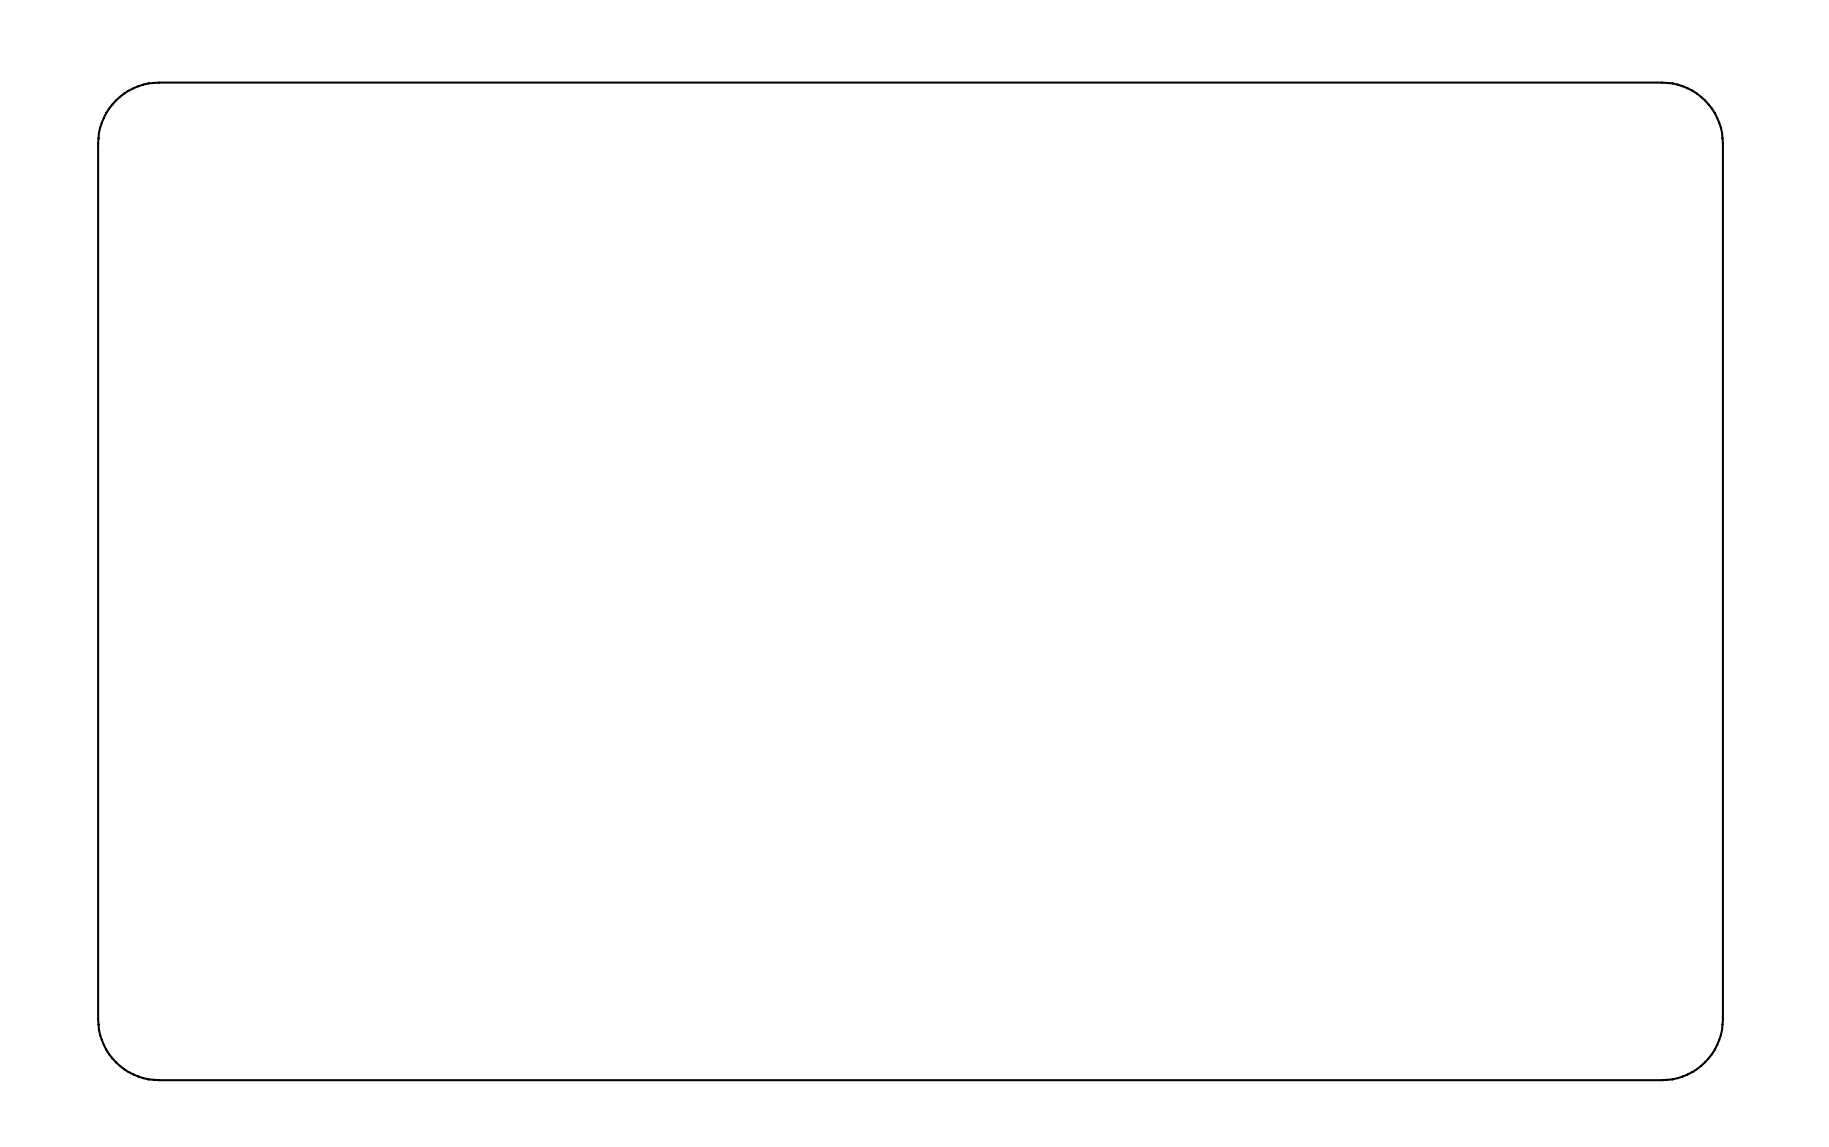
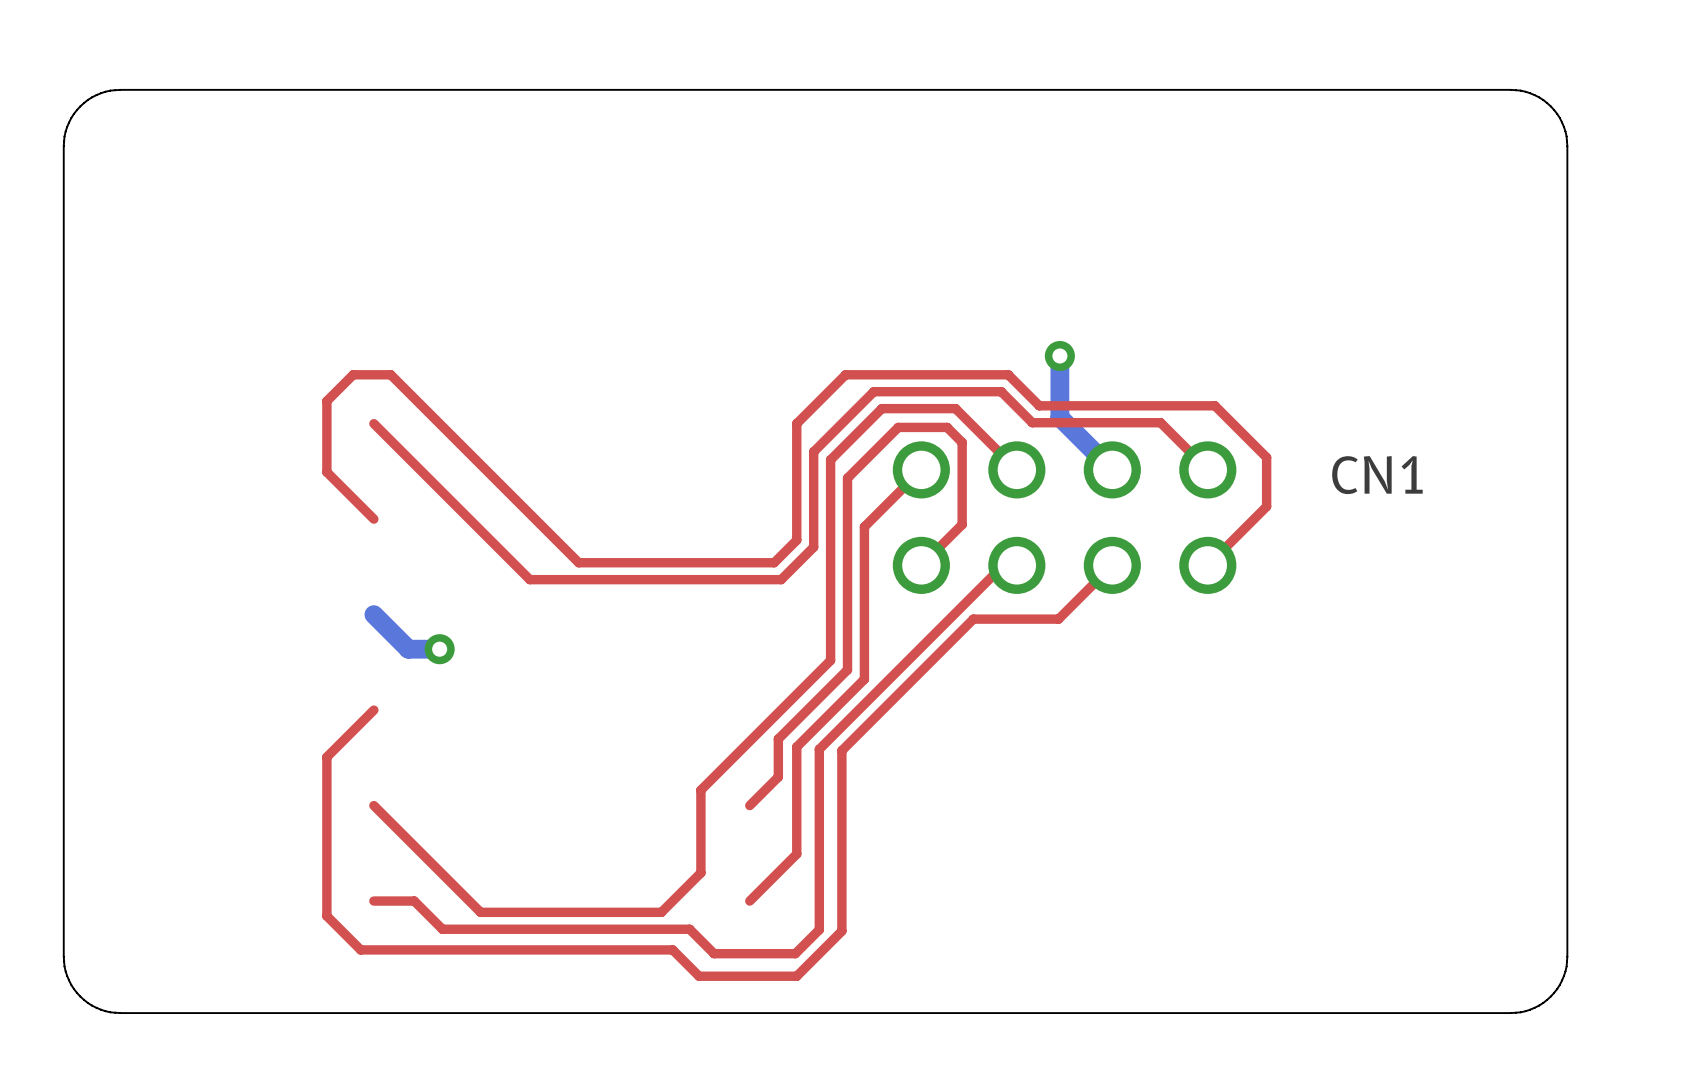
bottom track: none -> (1059, 356) (1059, 417) (1112, 469)
via: none -> (1059, 356)
top track: none -> (373, 423) (529, 579) (781, 579) (813, 547) (813, 451) (873, 391) (1001, 391) (1032, 422) (1160, 422) (1207, 469)
top track: none -> (921, 469) (864, 526) (864, 679) (796, 746) (796, 854) (749, 901)
top track: none -> (1016, 469) (955, 408) (881, 408) (830, 459) (830, 660) (700, 790) (700, 872) (661, 912) (480, 912) (373, 805)
CN1: none -> (1064, 517)
top track: none -> (373, 519) (326, 472) (326, 401) (353, 374) (390, 374) (578, 562) (774, 562) (796, 540) (796, 423) (845, 374) (1008, 374) (1039, 405) (1214, 405) (1266, 457) (1266, 506) (1207, 565)
top track: none -> (921, 565) (962, 524) (962, 442) (947, 427) (898, 427) (847, 478) (847, 669) (778, 739) (778, 777) (749, 805)
top track: none -> (1016, 565) (1003, 565) (819, 749) (819, 929) (795, 953) (714, 953) (689, 929) (442, 929) (414, 901) (373, 901)
top track: none -> (1112, 565) (1058, 619) (973, 619) (841, 750) (841, 931) (796, 976) (699, 976) (672, 949) (360, 949) (326, 916) (326, 757) (373, 710)
bottom track: none -> (373, 614) (408, 649) (439, 649)
via: none -> (439, 649)

